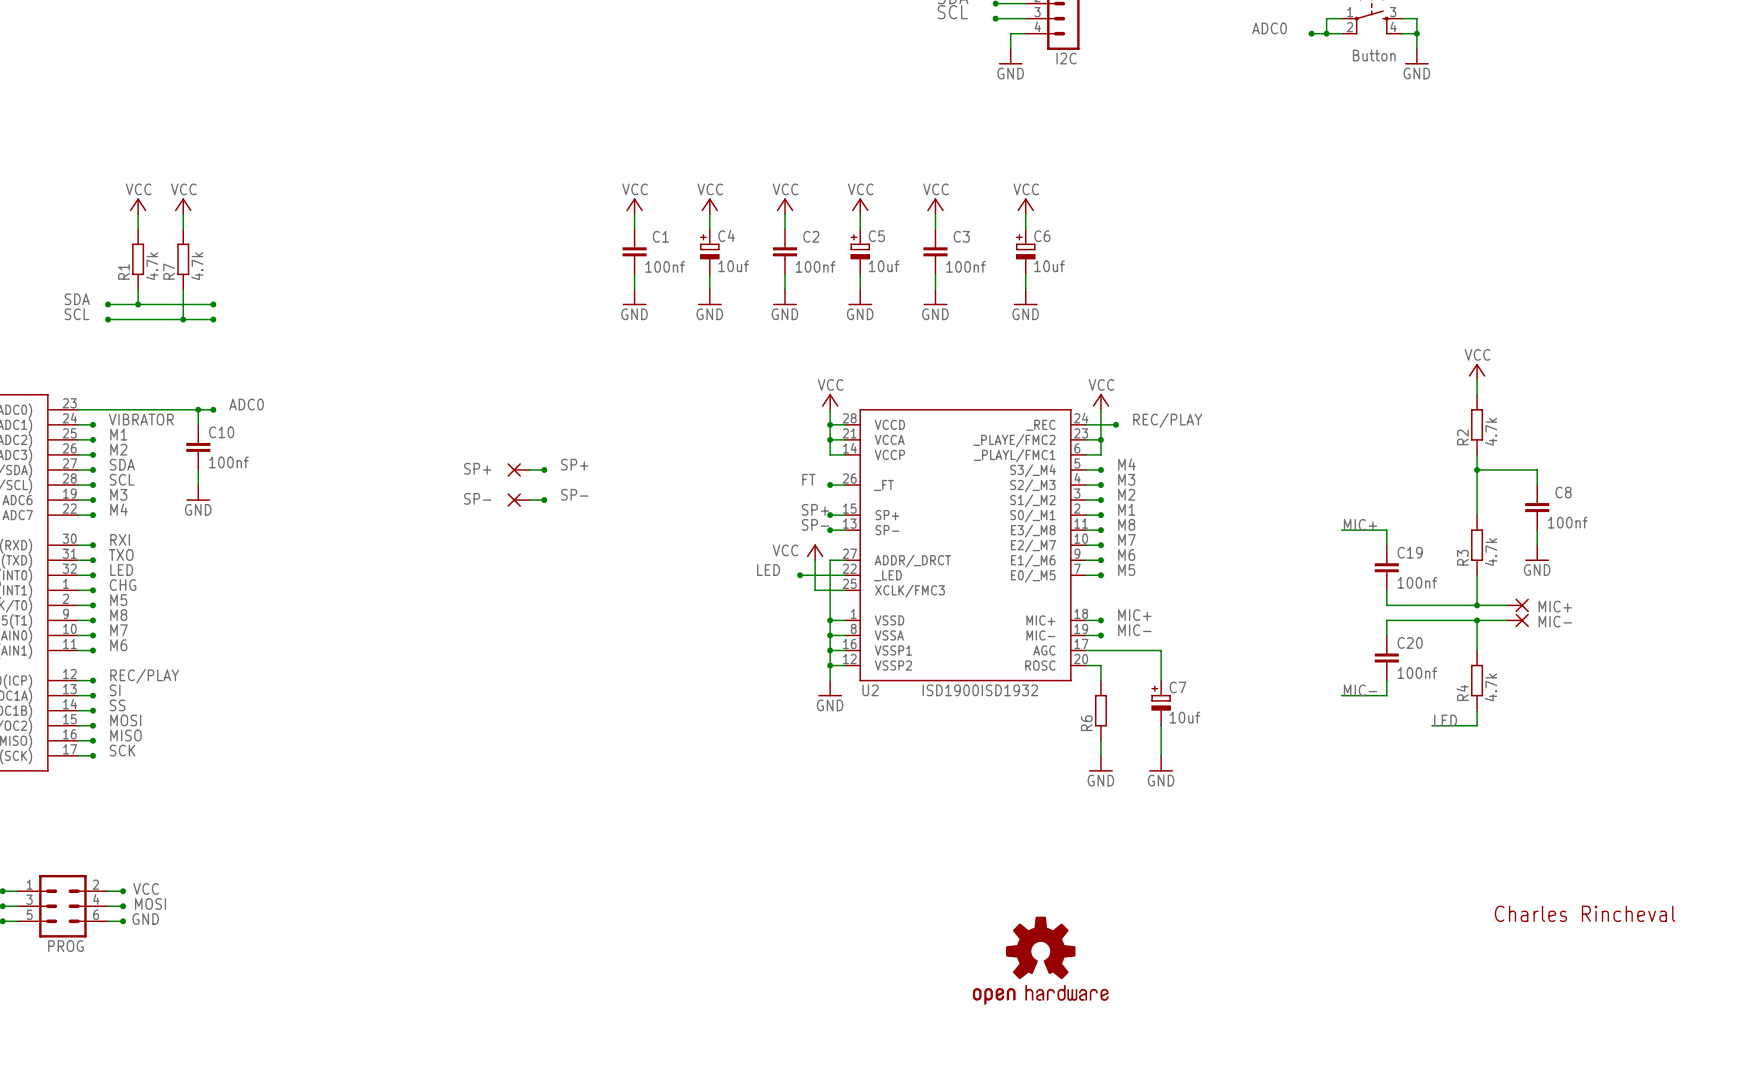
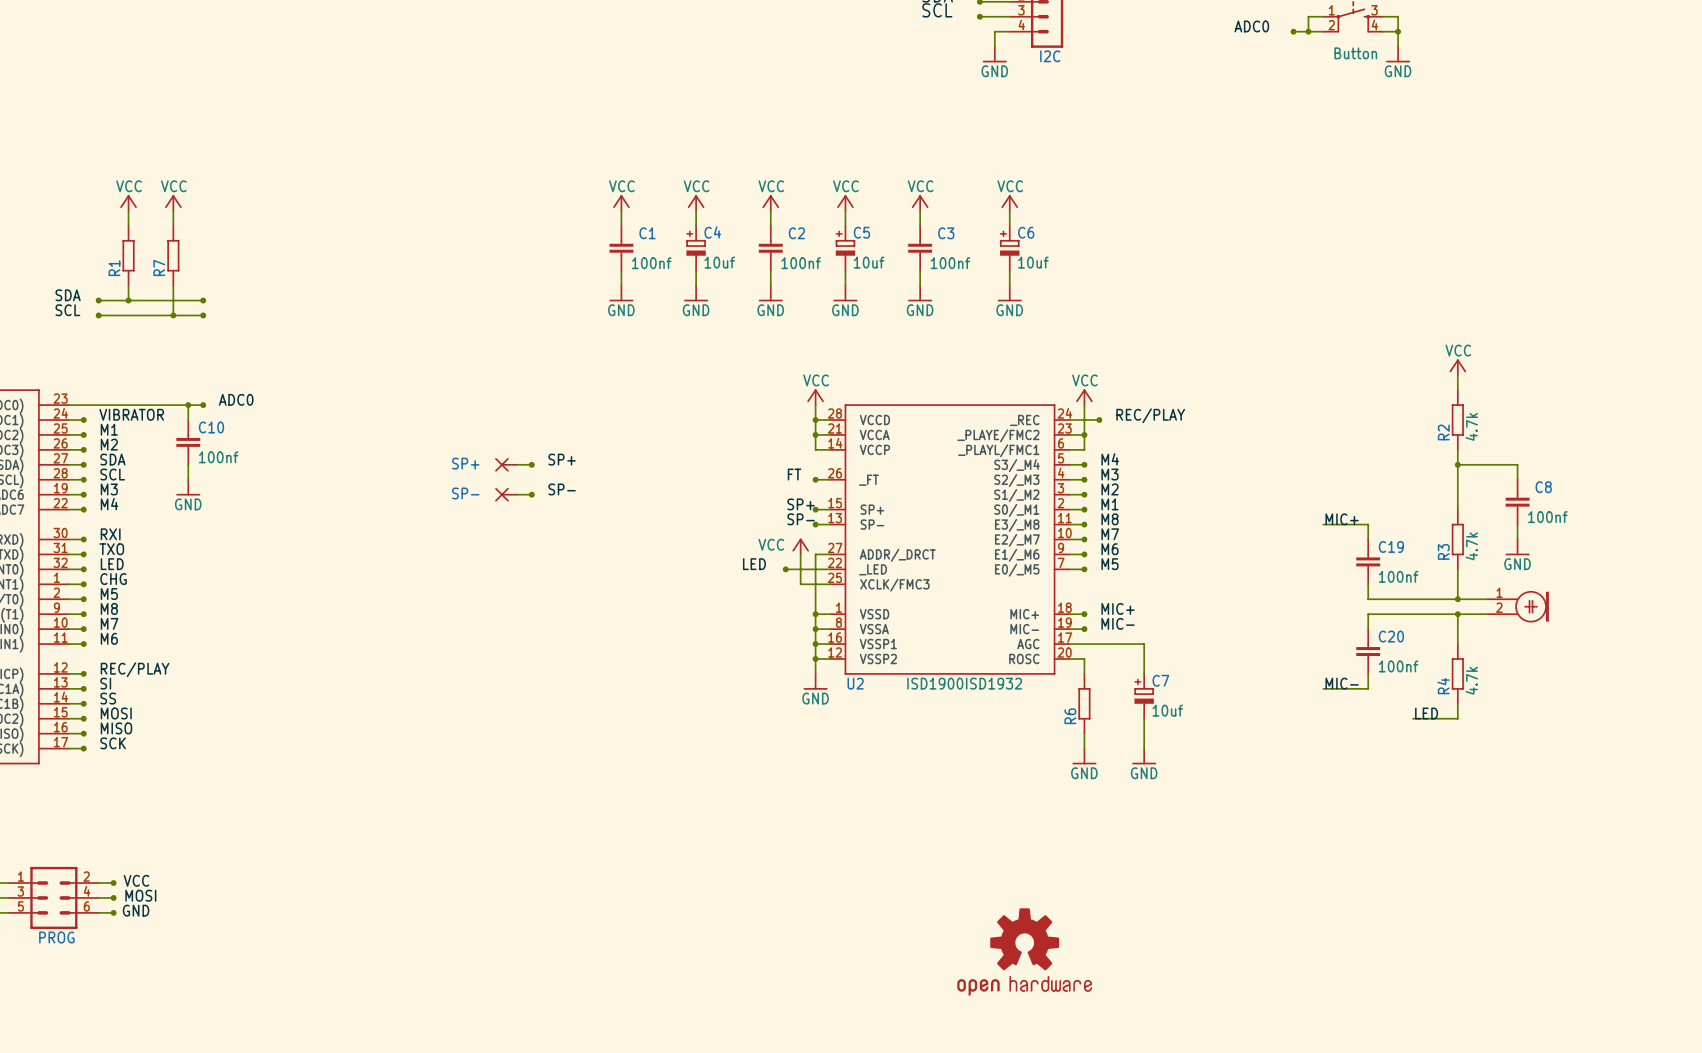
R1 value: 4.7k (152, 266) -> none
R7 value: 4.7k (197, 266) -> none
MIC+: (1518, 605) -> none
part: none -> (1518, 606)
MIC-: (1518, 620) -> none
text: Charles Rincheval (1585, 913) -> none

